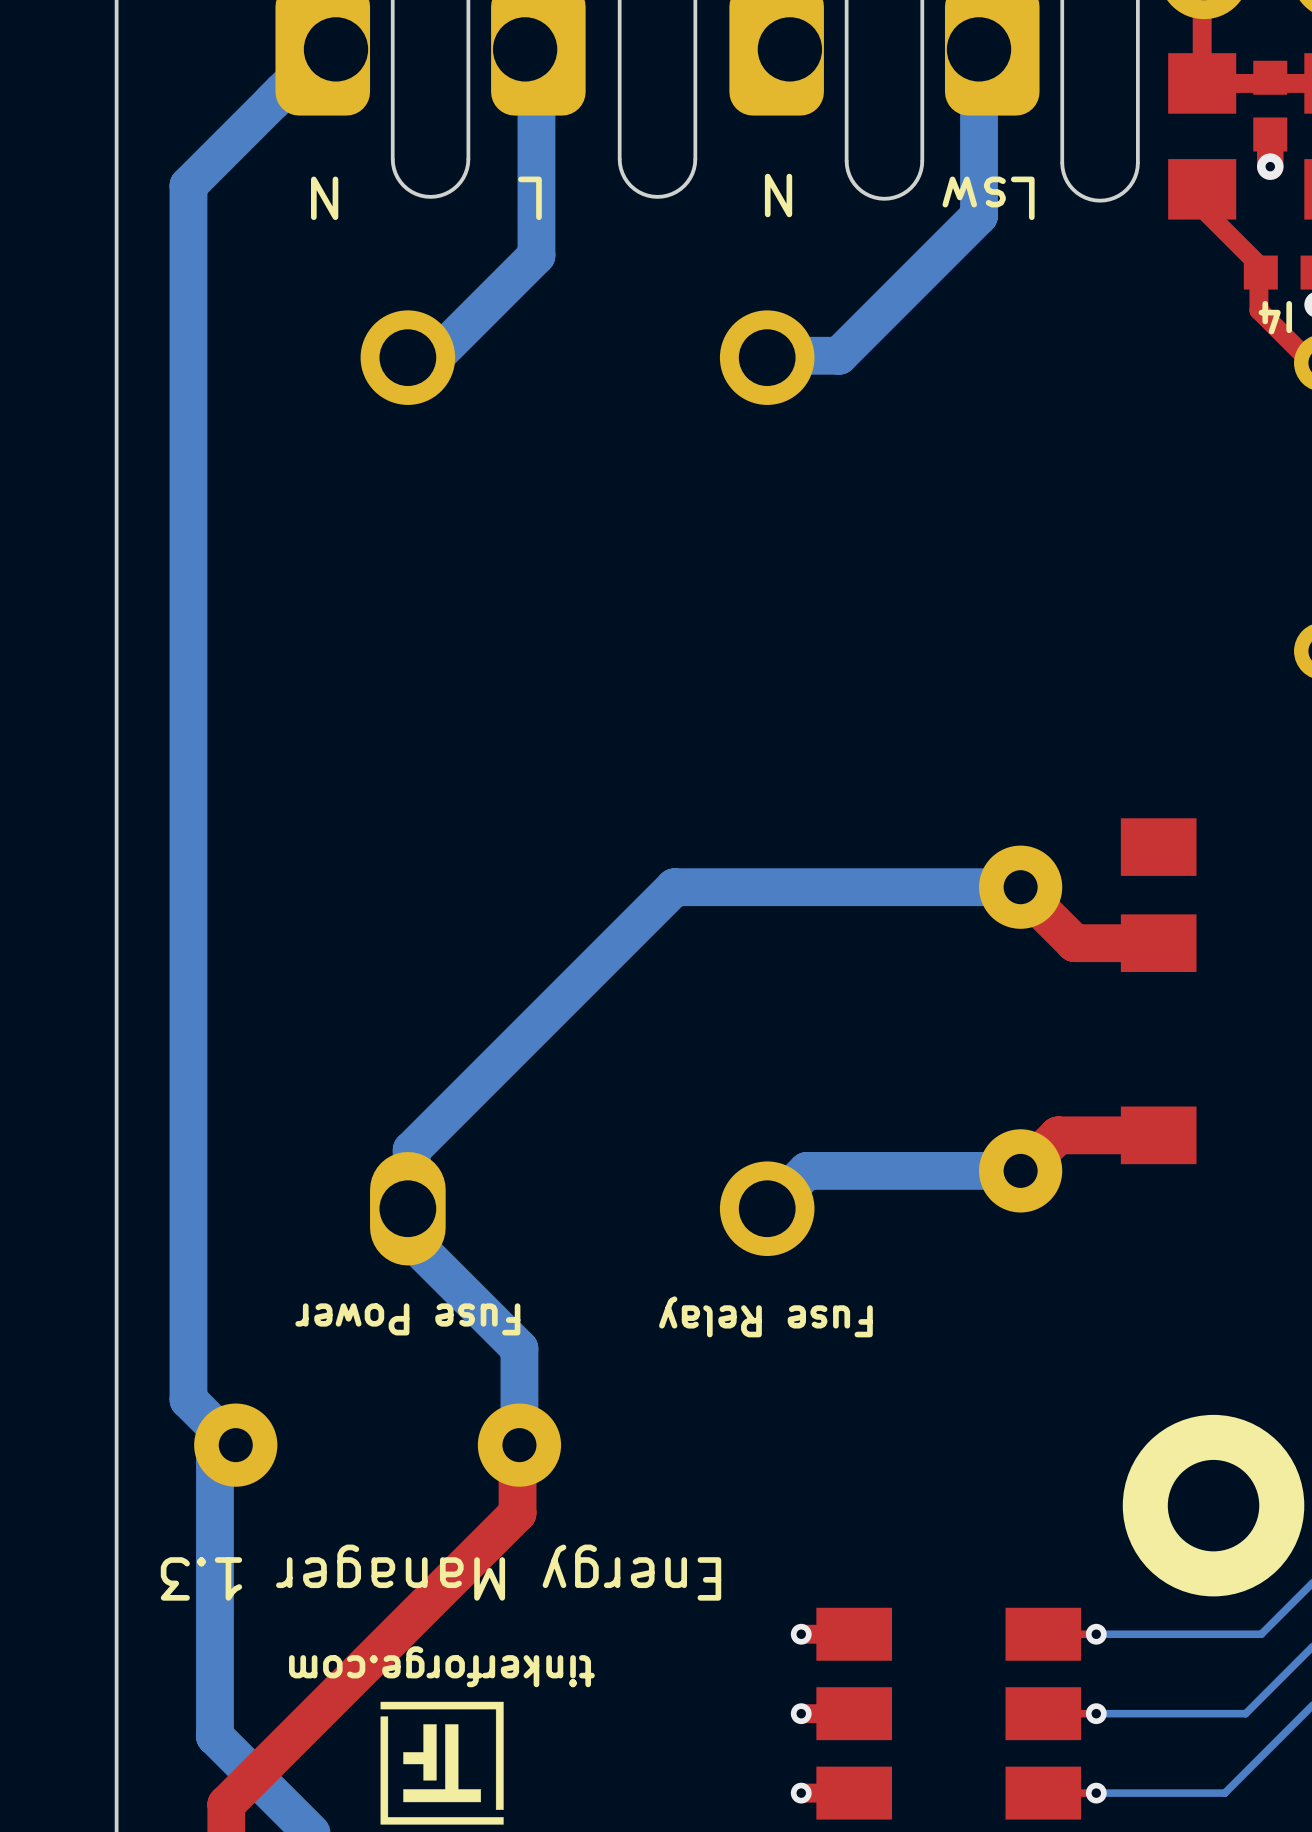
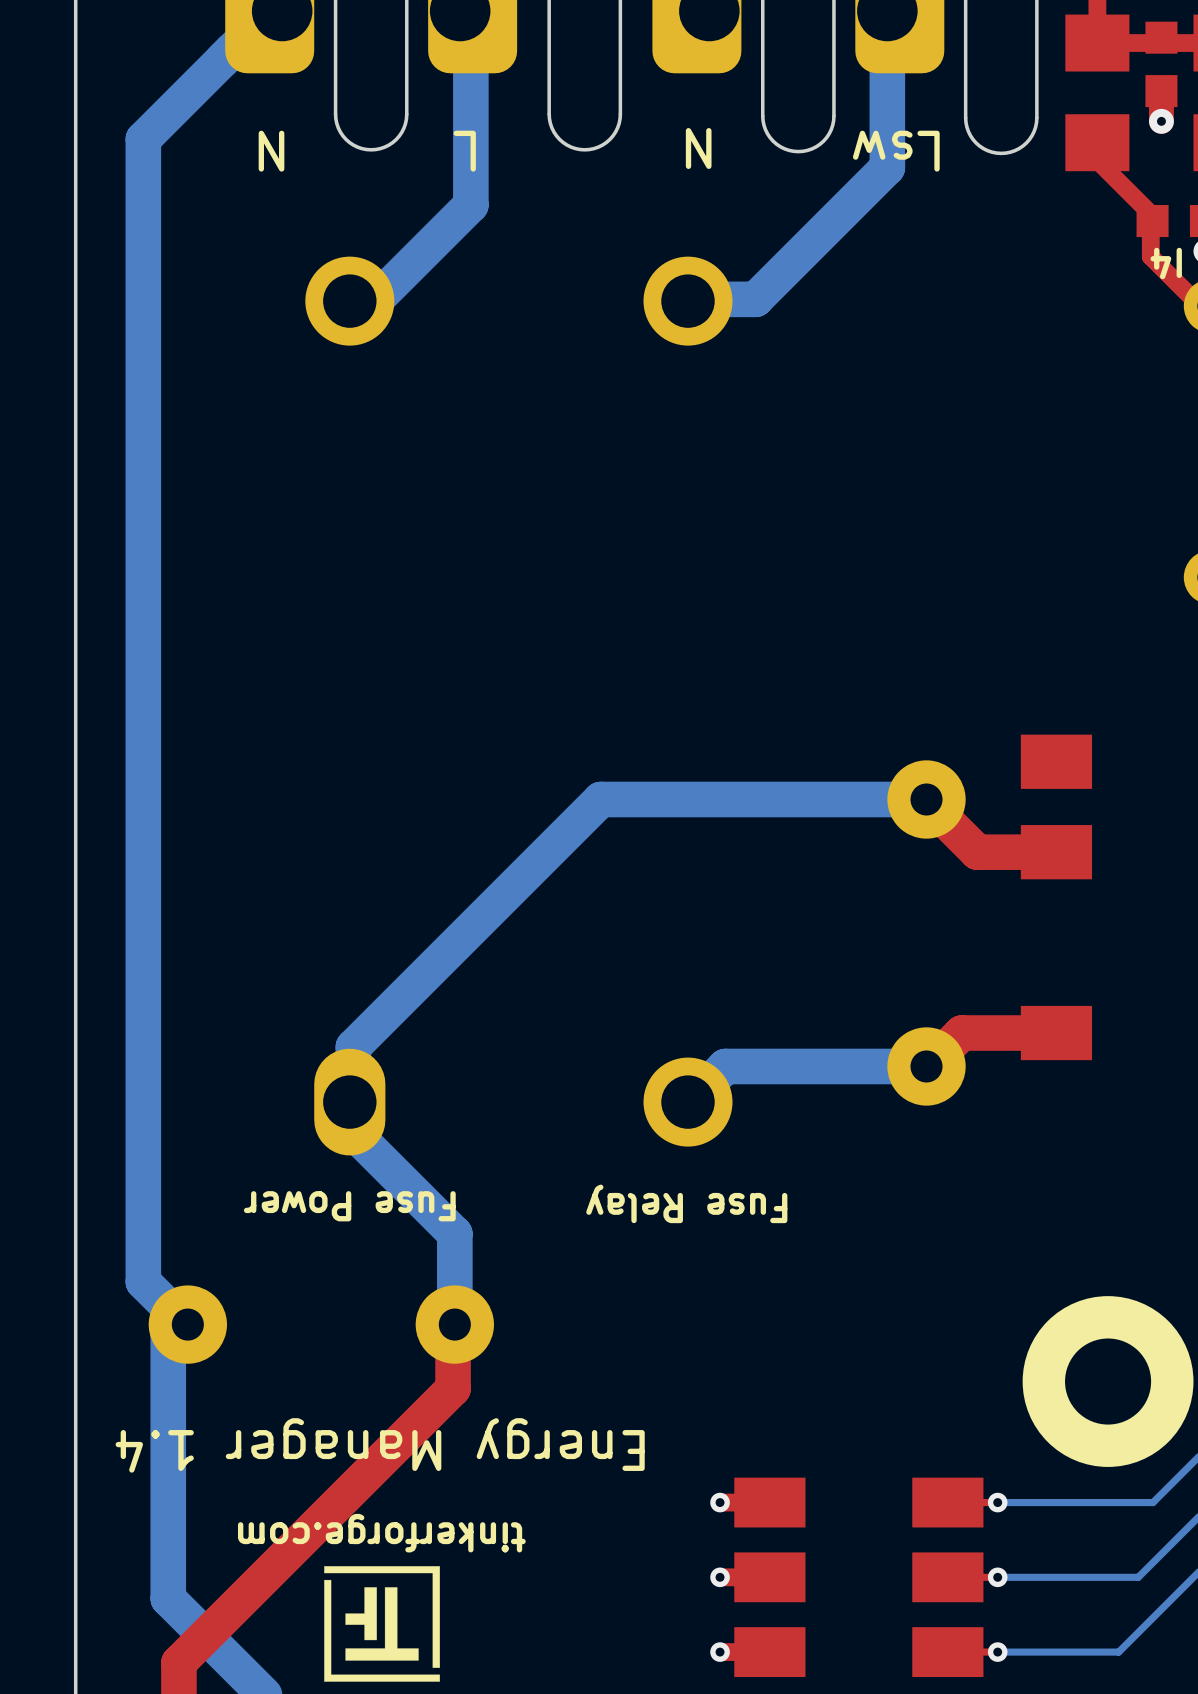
text: Energy Manager 1.3 (441, 1572) -> Energy Manager 1.4 (380, 1445)

